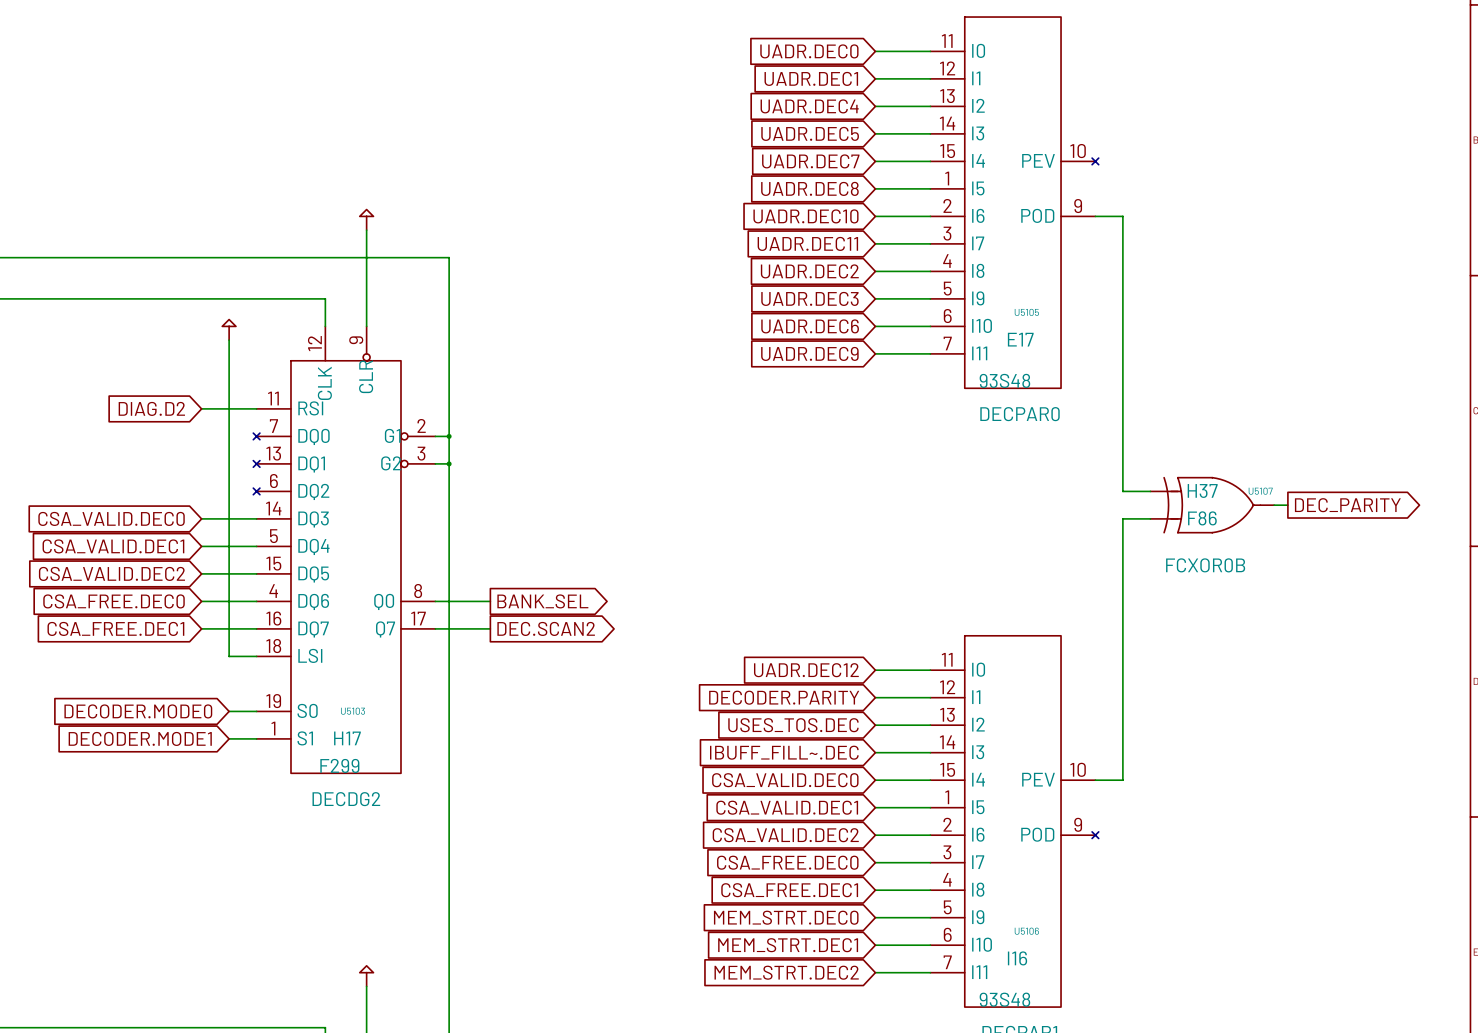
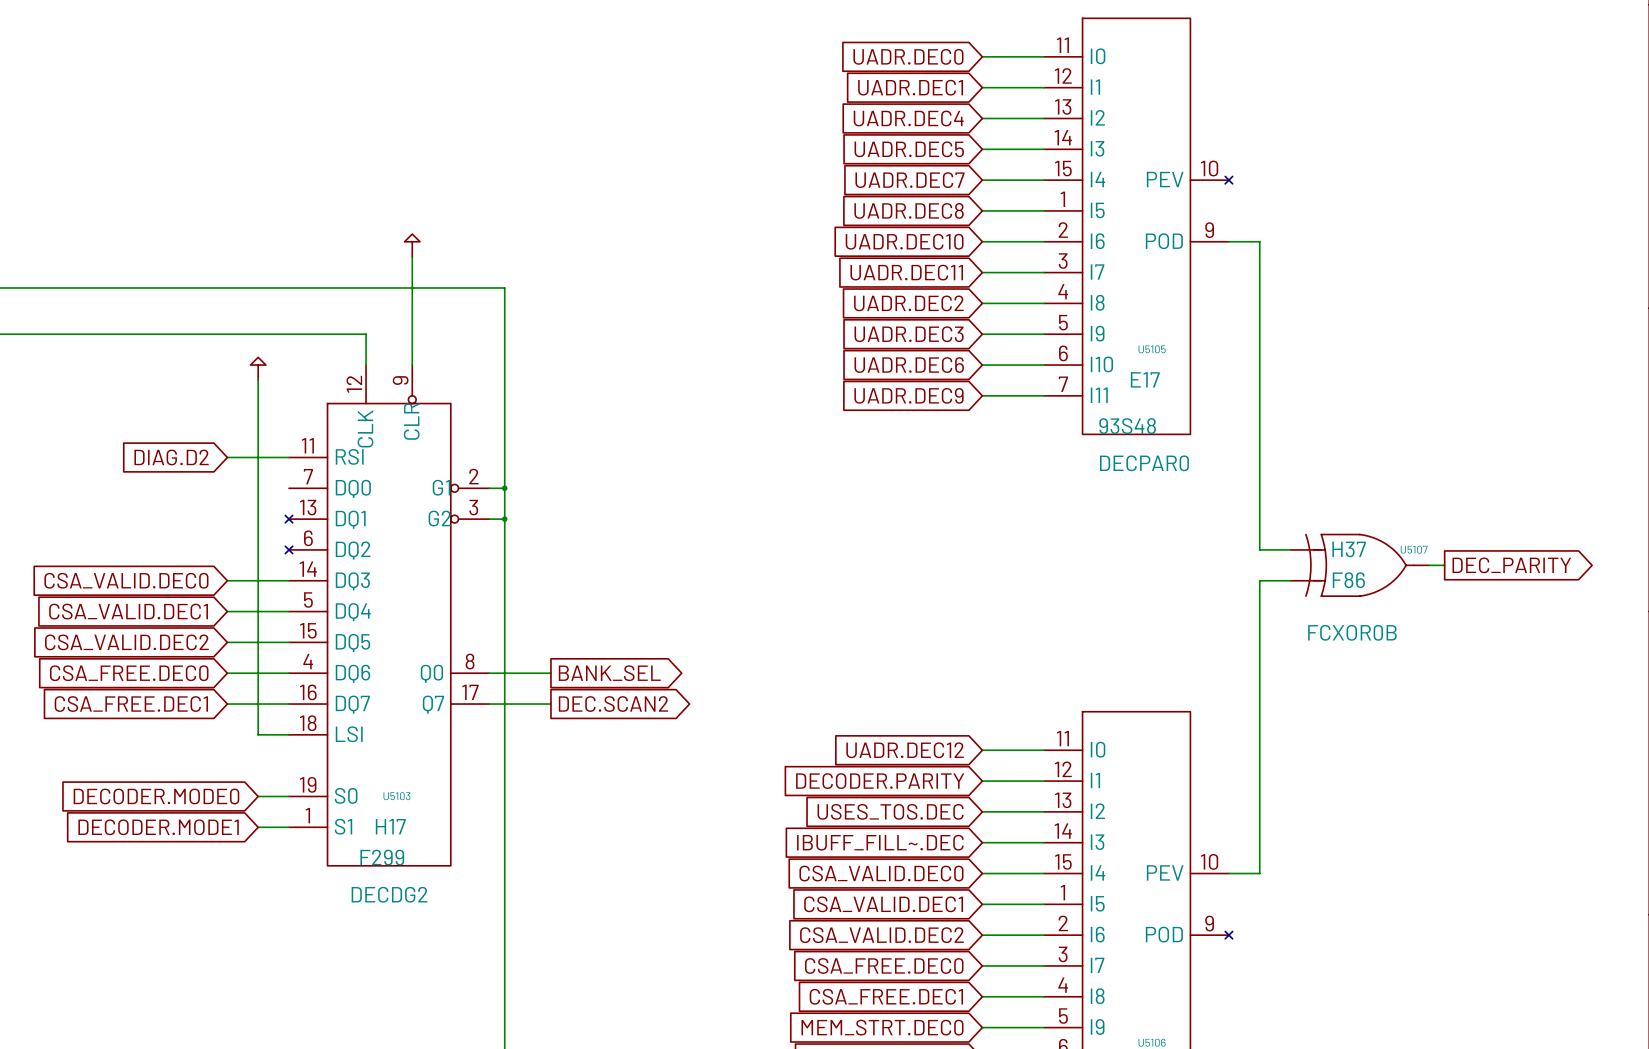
no-connect mark: (256, 436) -> none

